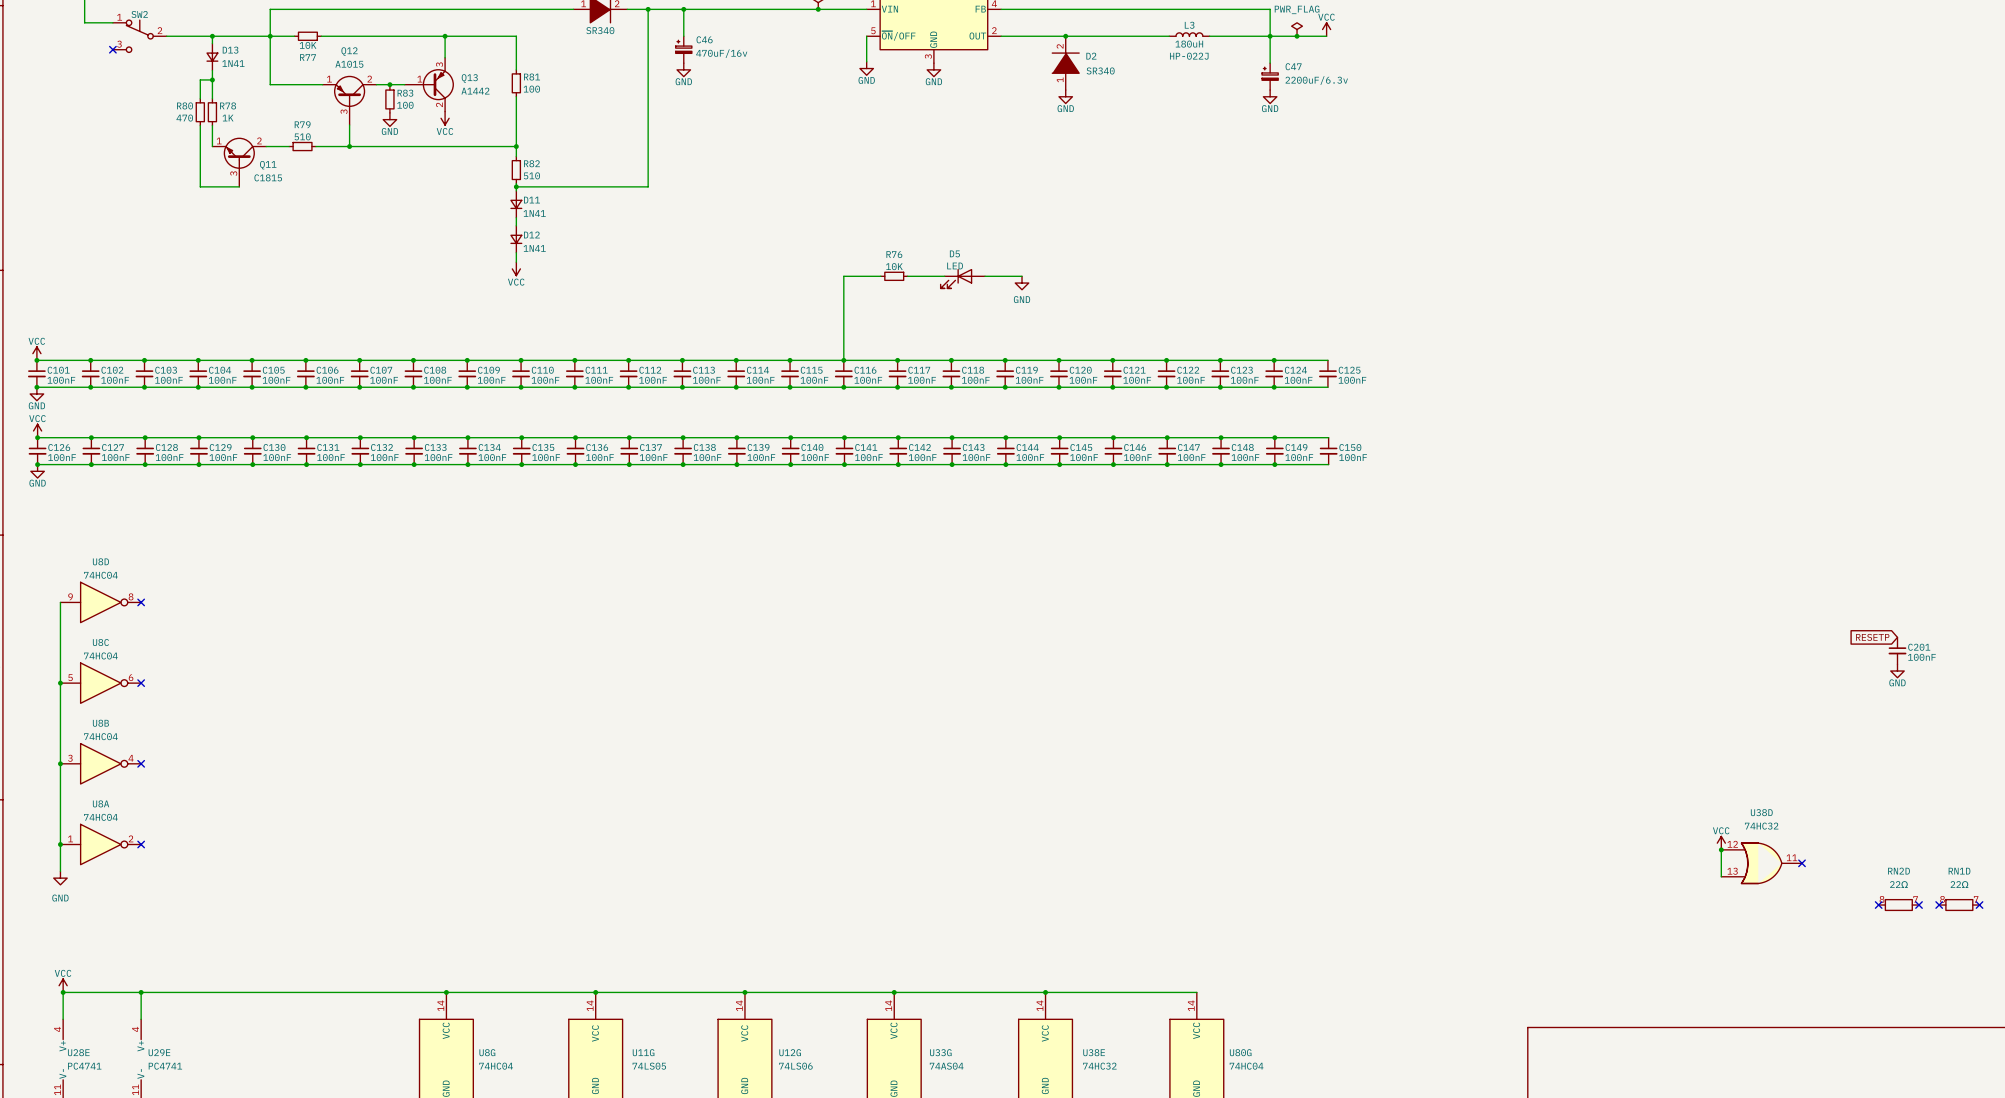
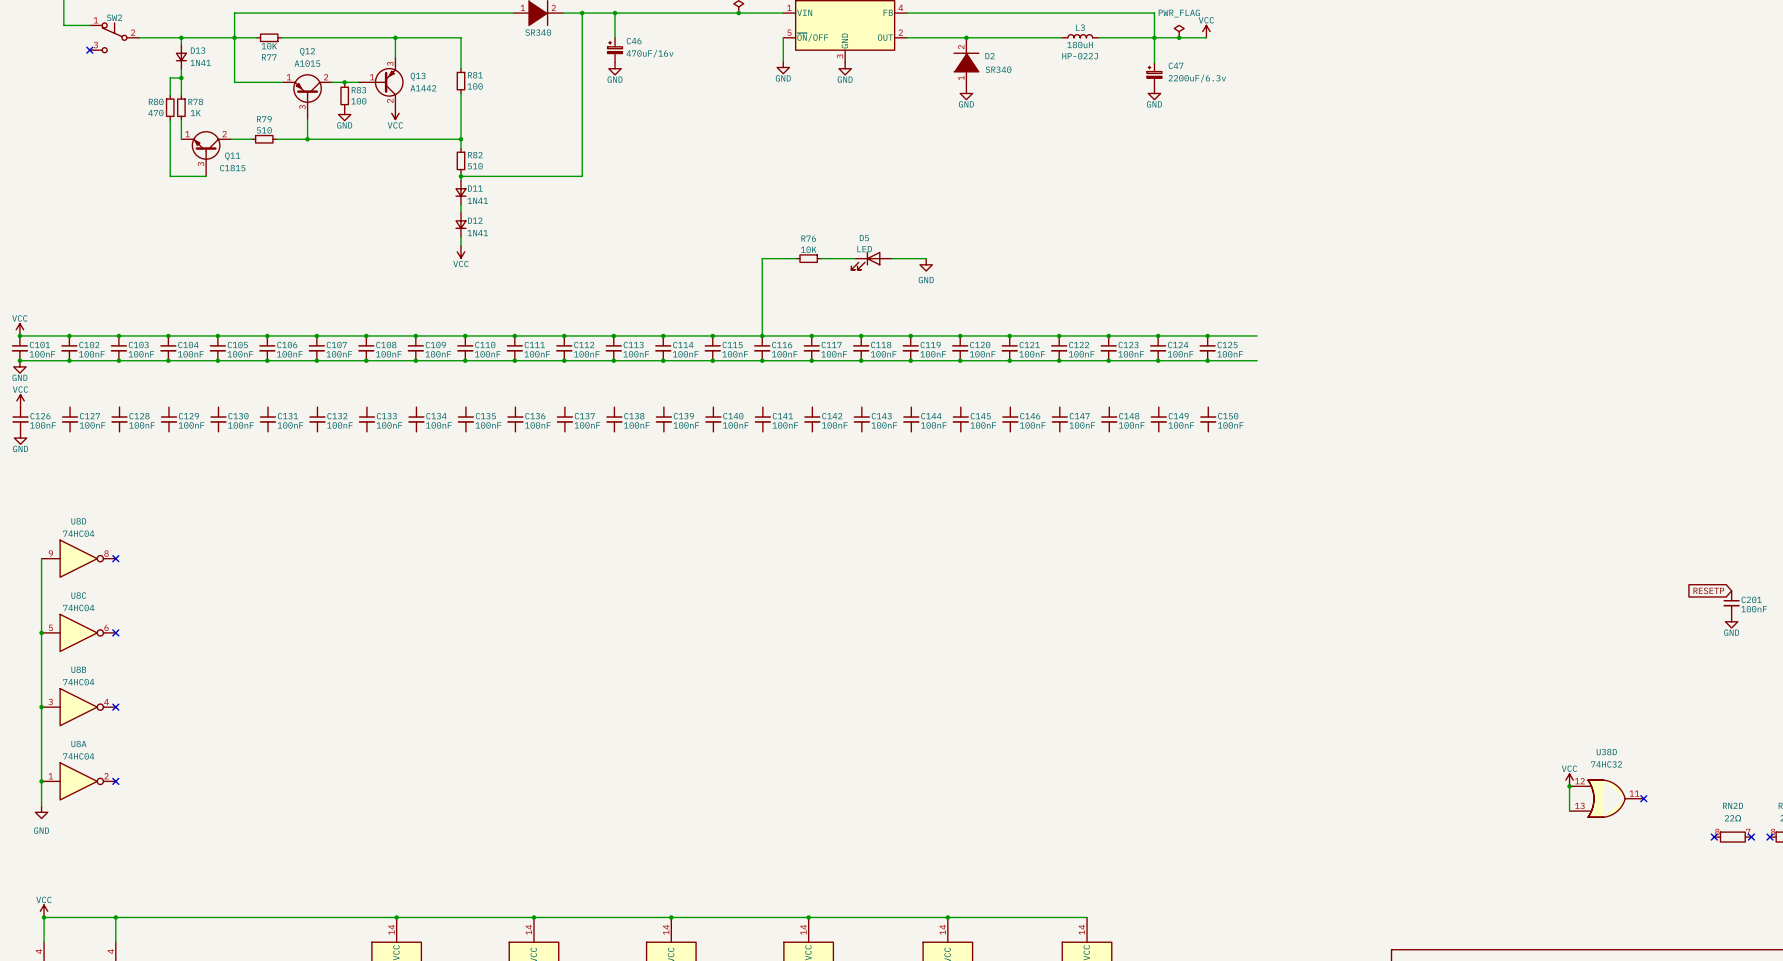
wire: none -> (1207, 335) (1257, 335)
junction: none -> (1207, 335)
wire: none -> (1207, 360) (1257, 360)
junction: none -> (1207, 360)
wire: (37, 437) (1328, 437) -> none
junction: (37, 437) -> none
junction: (91, 437) -> none
junction: (145, 437) -> none
junction: (198, 437) -> none
junction: (252, 437) -> none
junction: (306, 437) -> none
junction: (360, 437) -> none
junction: (414, 437) -> none
junction: (467, 437) -> none
junction: (521, 437) -> none
junction: (575, 437) -> none
junction: (629, 437) -> none
junction: (683, 437) -> none
junction: (736, 437) -> none
junction: (790, 437) -> none
junction: (844, 437) -> none
junction: (898, 437) -> none
junction: (952, 437) -> none
junction: (1005, 437) -> none
junction: (1059, 437) -> none
junction: (1113, 437) -> none
junction: (1167, 437) -> none
junction: (1221, 437) -> none
junction: (1274, 437) -> none
wire: (37, 464) (1328, 464) -> none
junction: (37, 464) -> none
junction: (91, 464) -> none
junction: (145, 464) -> none
junction: (198, 464) -> none
junction: (252, 464) -> none
junction: (306, 464) -> none
junction: (360, 464) -> none
junction: (414, 464) -> none
junction: (467, 464) -> none
junction: (521, 464) -> none
junction: (575, 464) -> none
junction: (629, 464) -> none
junction: (683, 464) -> none
junction: (736, 464) -> none
junction: (790, 464) -> none
junction: (844, 464) -> none
junction: (898, 464) -> none
junction: (952, 464) -> none
junction: (1005, 464) -> none
junction: (1059, 464) -> none
junction: (1113, 464) -> none
junction: (1167, 464) -> none
junction: (1221, 464) -> none
junction: (1274, 464) -> none

